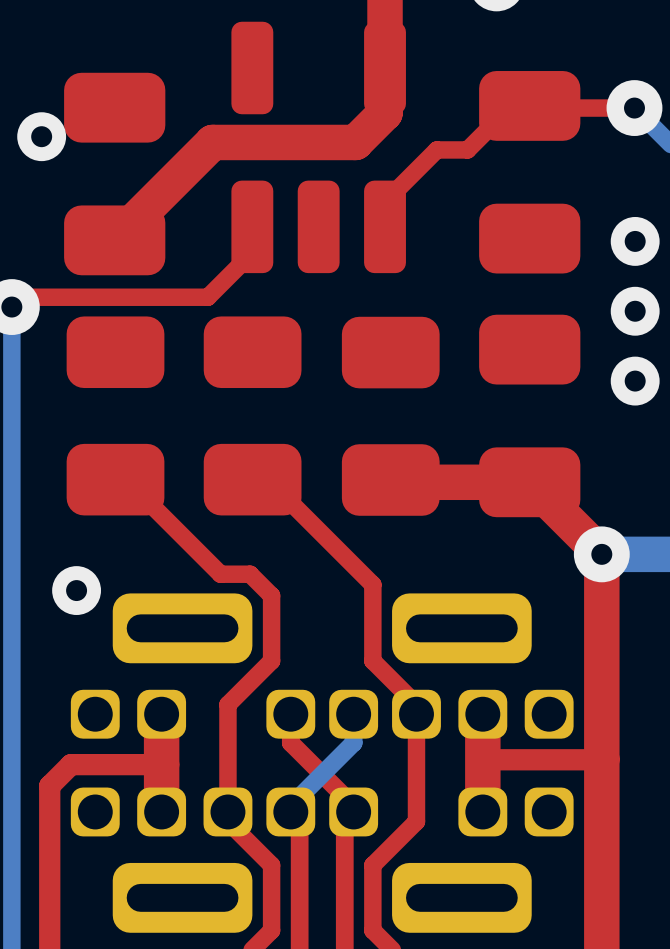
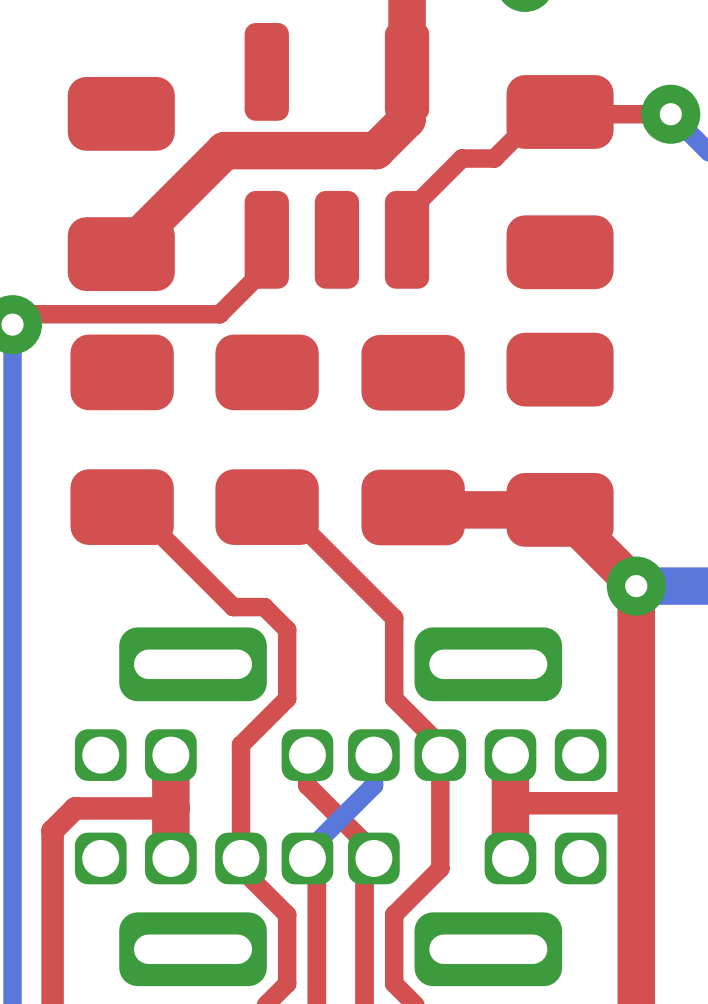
via: (41, 136) -> none
via: (635, 241) -> none
via: (635, 311) -> none
via: (635, 381) -> none
via: (76, 590) -> none

